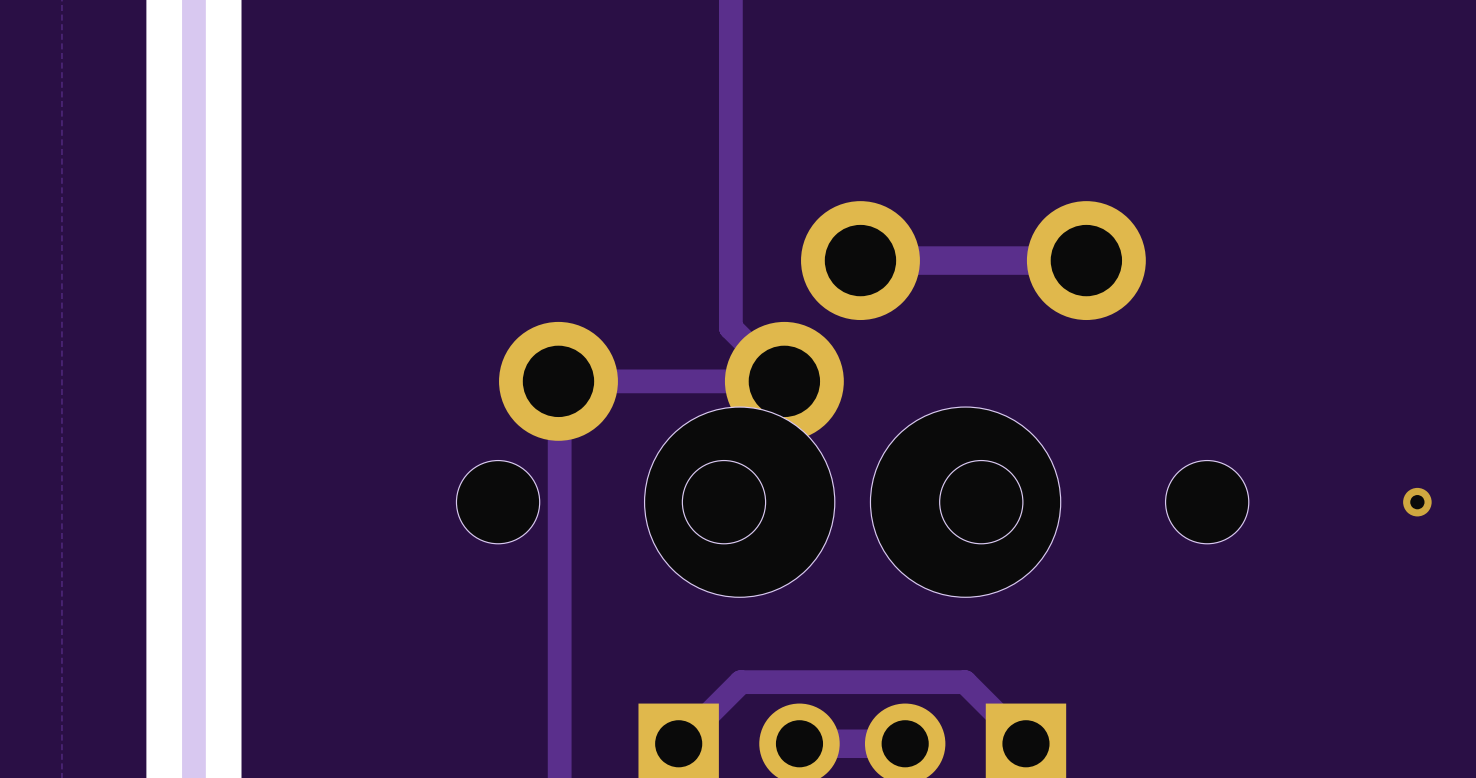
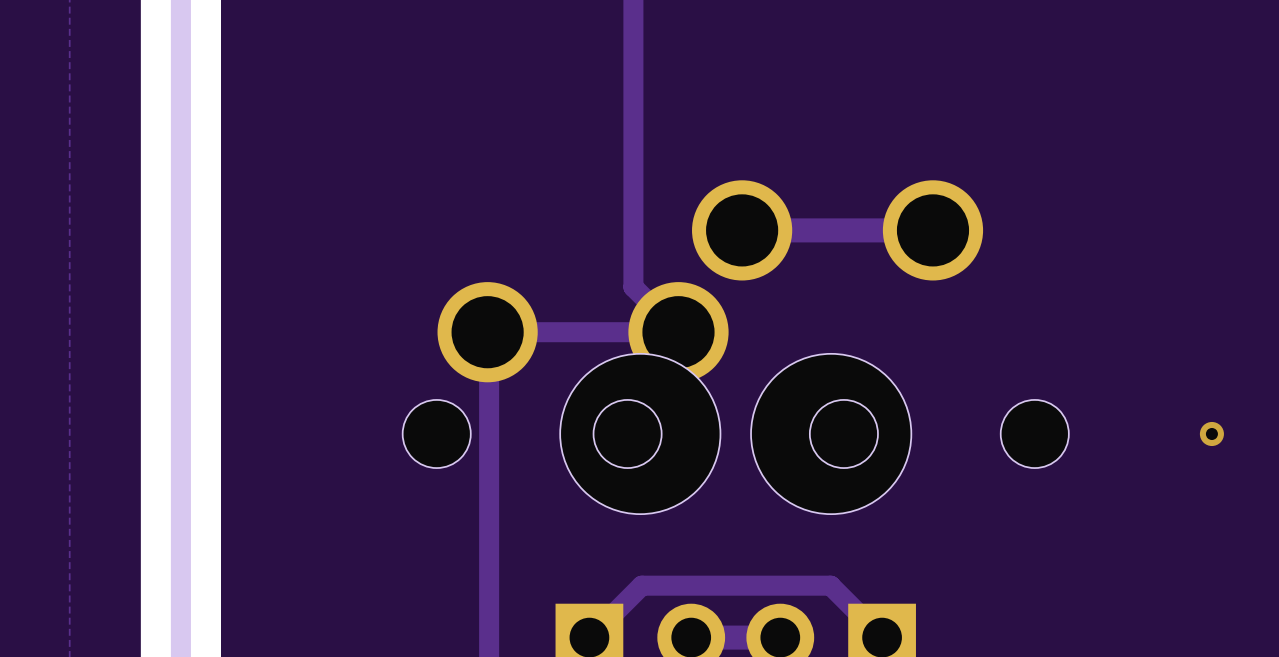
part footprint: [456, 201, 1249, 598] -> [402, 180, 1069, 515]

